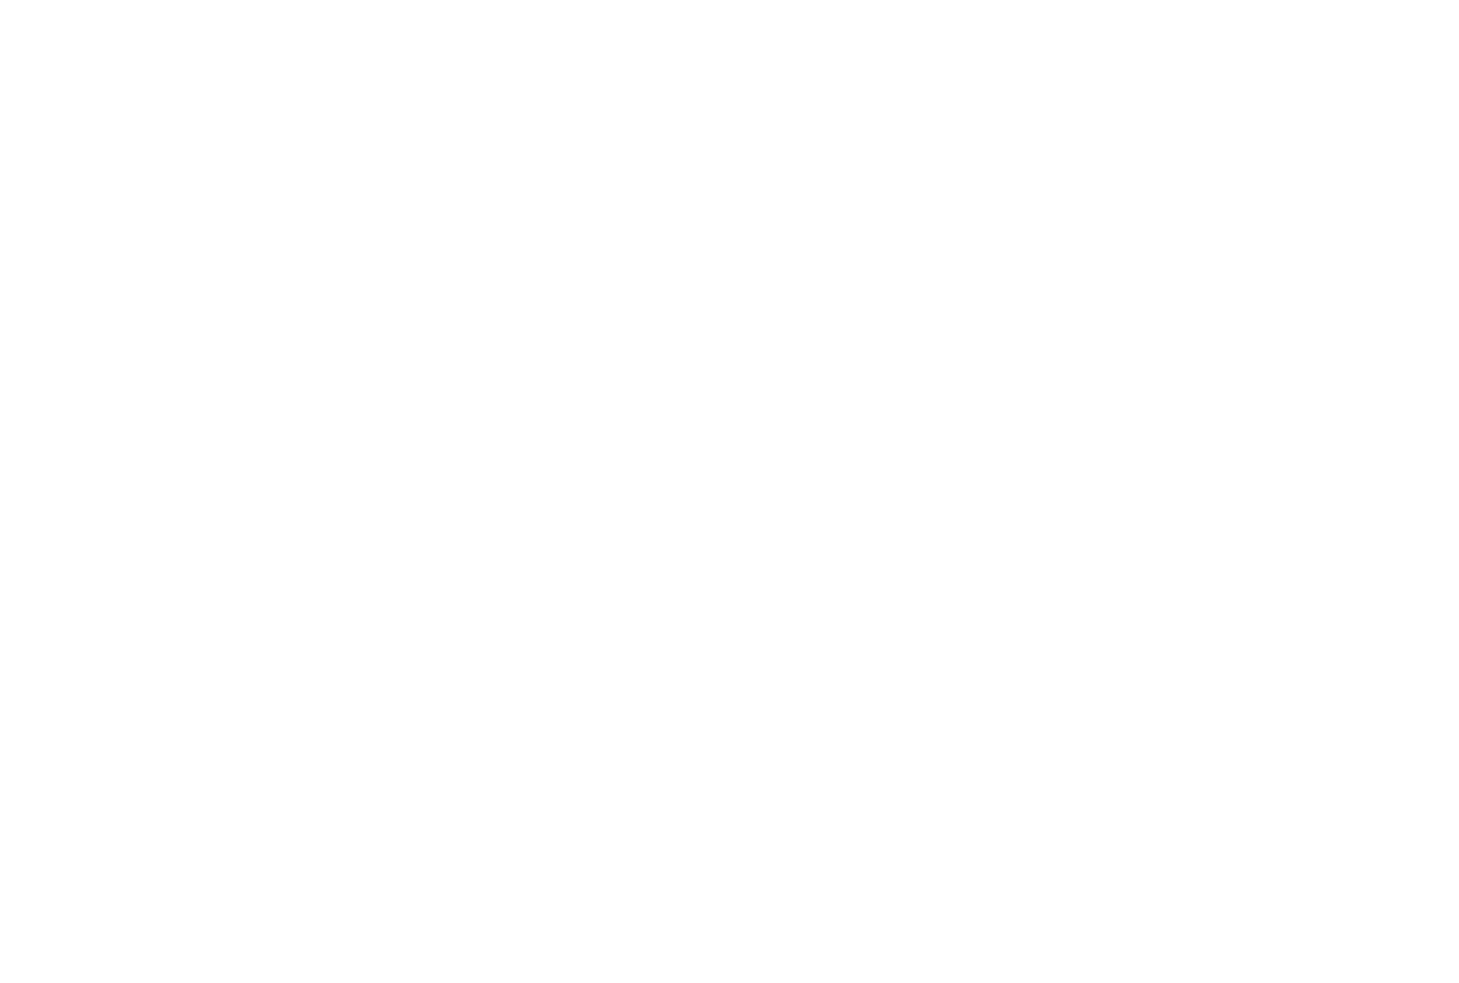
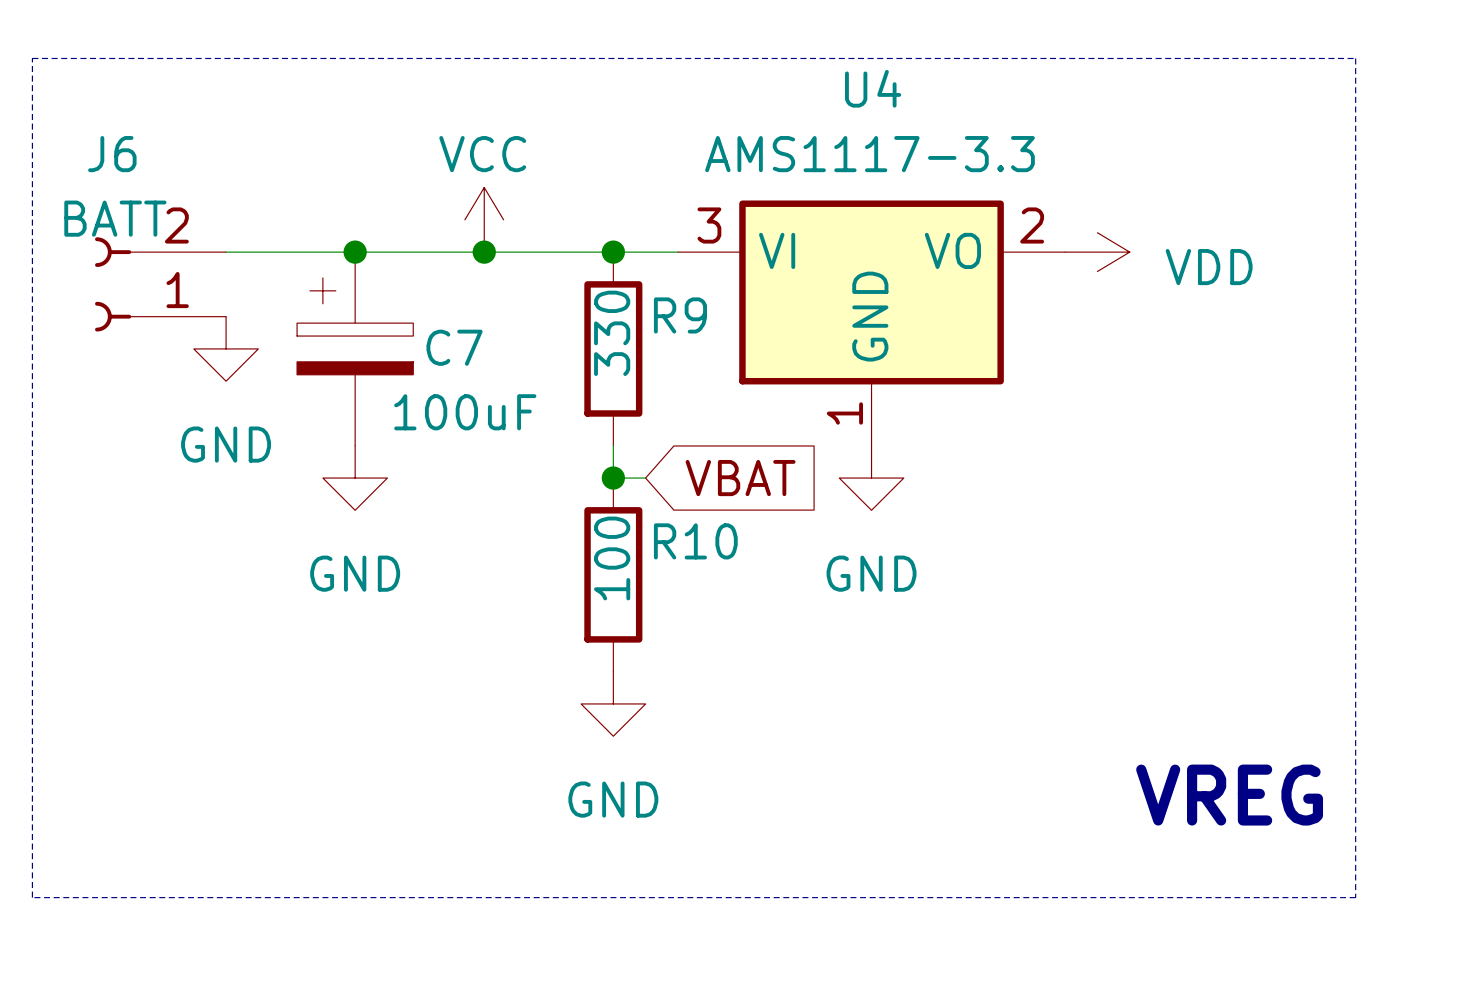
line: none -> (32, 58) (1355, 58) (1355, 897) (32, 897) (32, 58)
power symbol: none -> VCC (484, 219)
wire: none -> (226, 252) (677, 252)
junction: none -> (355, 252)
junction: none -> (484, 252)
junction: none -> (613, 252)
power symbol: none -> VDD (1097, 252)
J6: none -> BATT (160, 284)
U4: none -> AMS1117-3.3 (871, 323)
power symbol: none -> GND (226, 348)
C7: none -> 100uF (355, 348)
R9: none -> 330 (613, 348)
wire: none -> (613, 445) (613, 478) (645, 478)
power symbol: none -> GND (355, 478)
junction: none -> (613, 478)
global label: none -> VBAT (740, 478)
power symbol: none -> GND (871, 478)
R10: none -> 100 (613, 574)
power symbol: none -> GND (613, 703)
text: none -> VREG (1229, 795)

